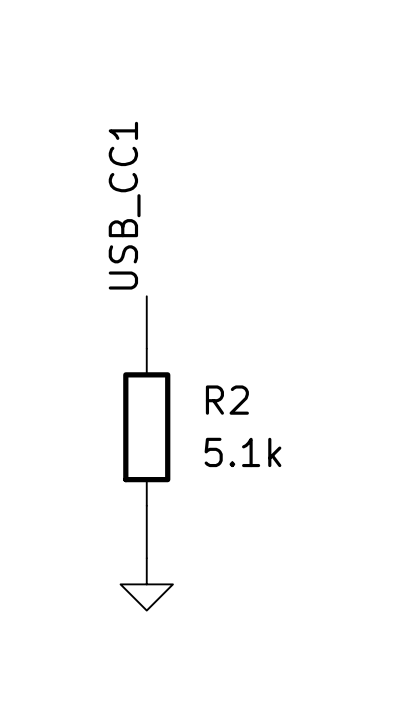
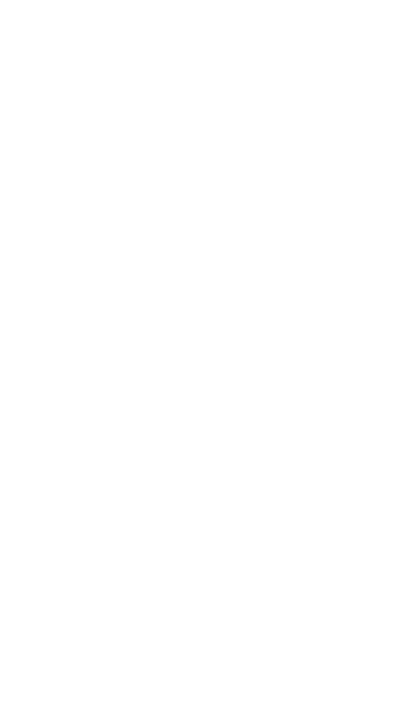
label: USB_CC1 (124, 205) -> none
wire: (146, 296) (146, 348) -> none
R2: 5.1k (146, 427) -> none
wire: (146, 505) (146, 558) -> none
power symbol: (146, 584) -> none

